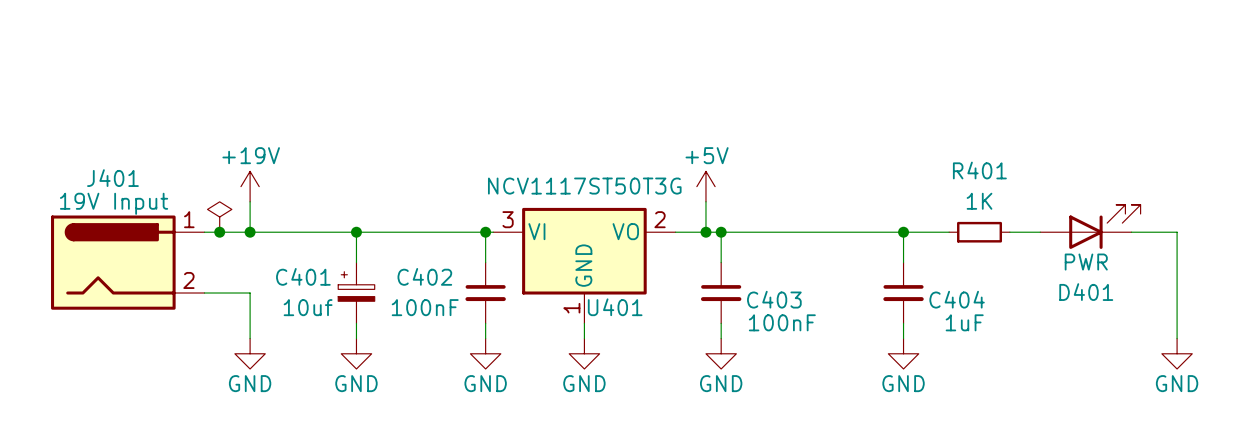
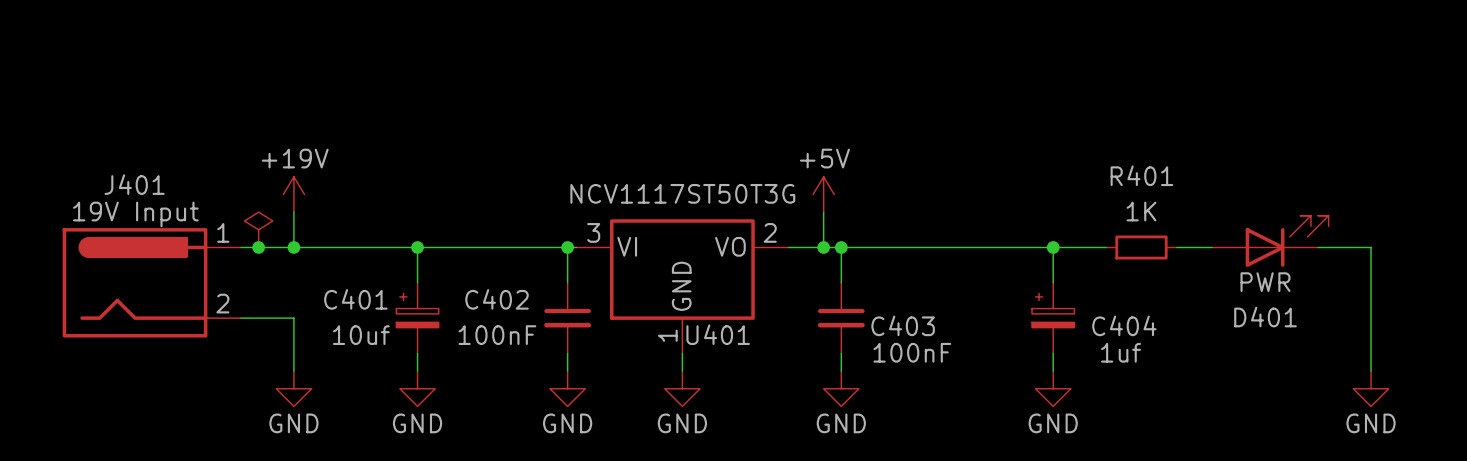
C404 symbol: [883, 262, 924, 324] -> [1032, 282, 1075, 354]
C404 value: 1uF (964, 322) -> 1uf (1121, 352)

